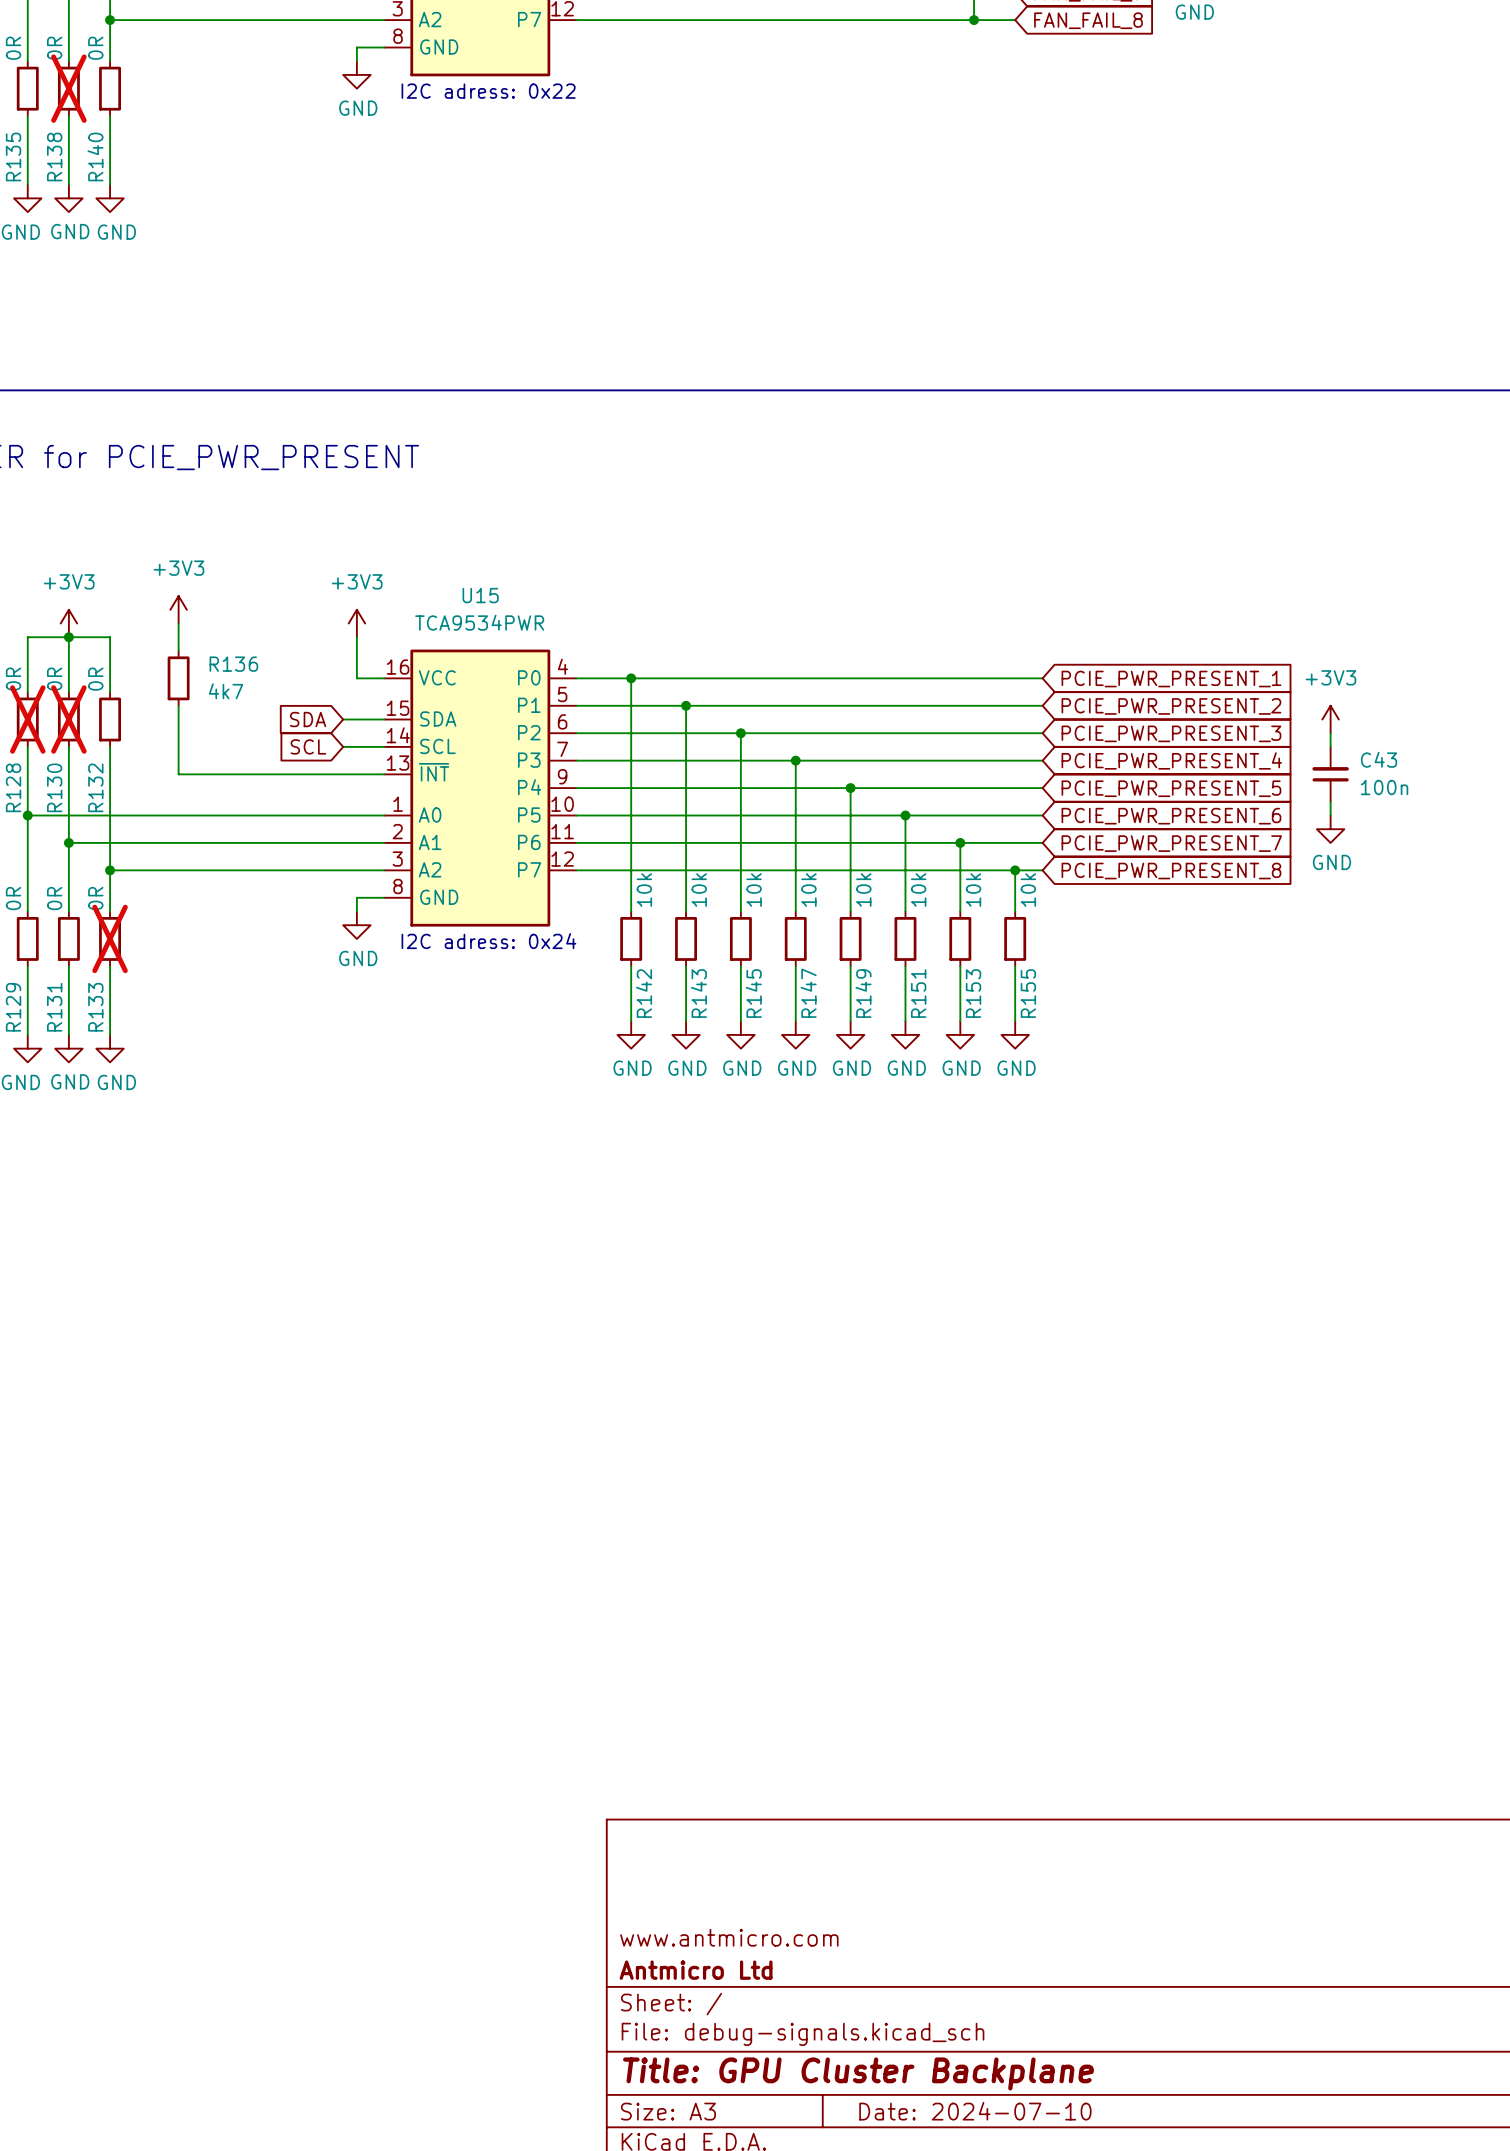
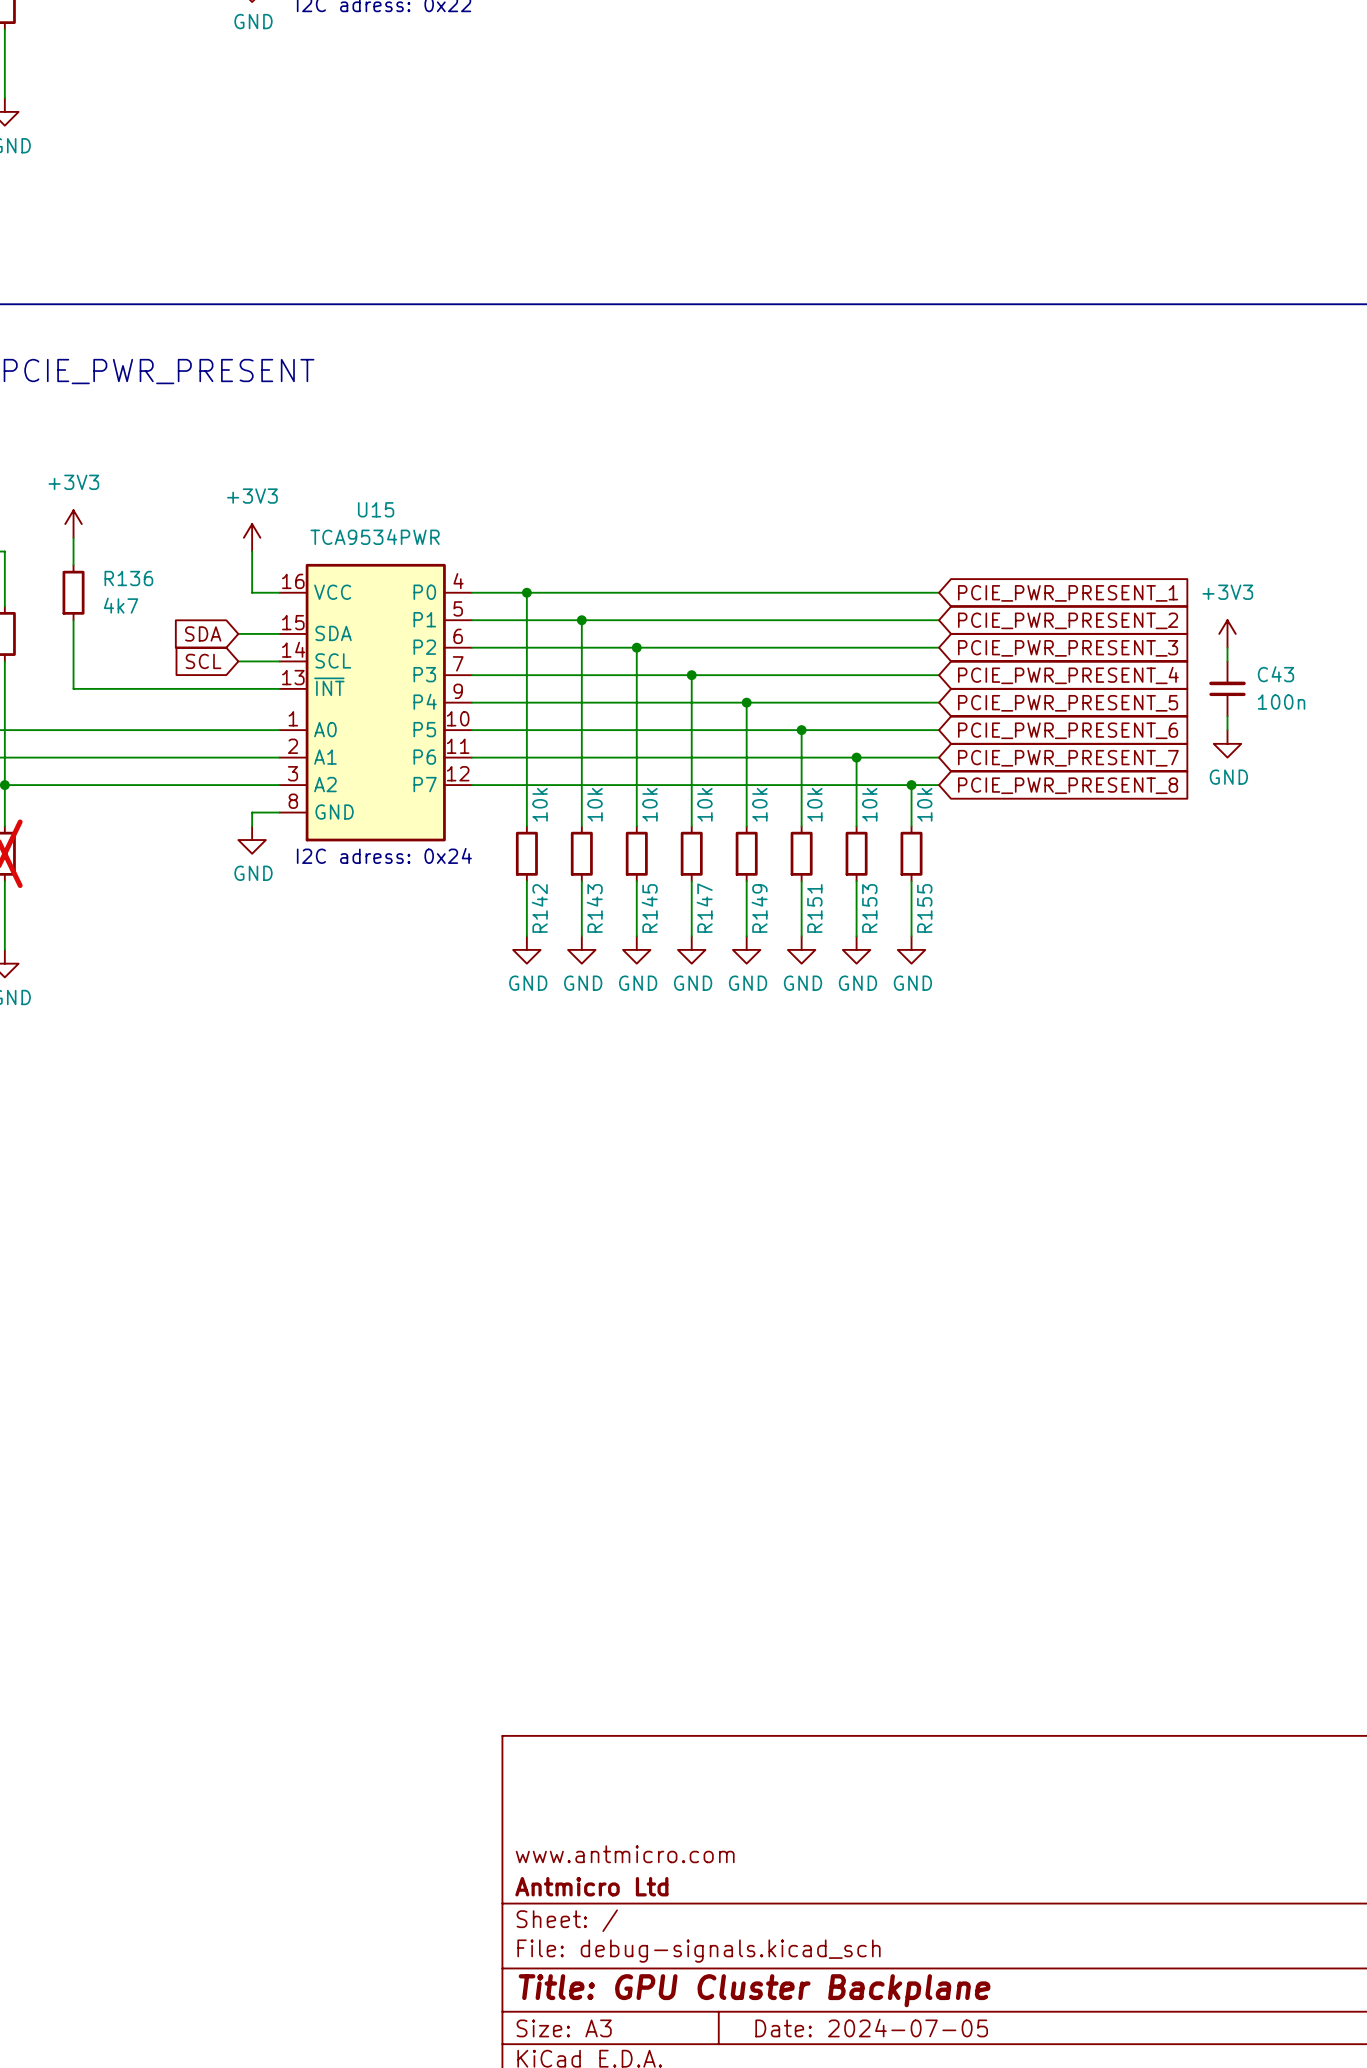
title block: Date: 2024-07-10 (975, 2111) -> Date: 2024-07-05 (871, 2028)

